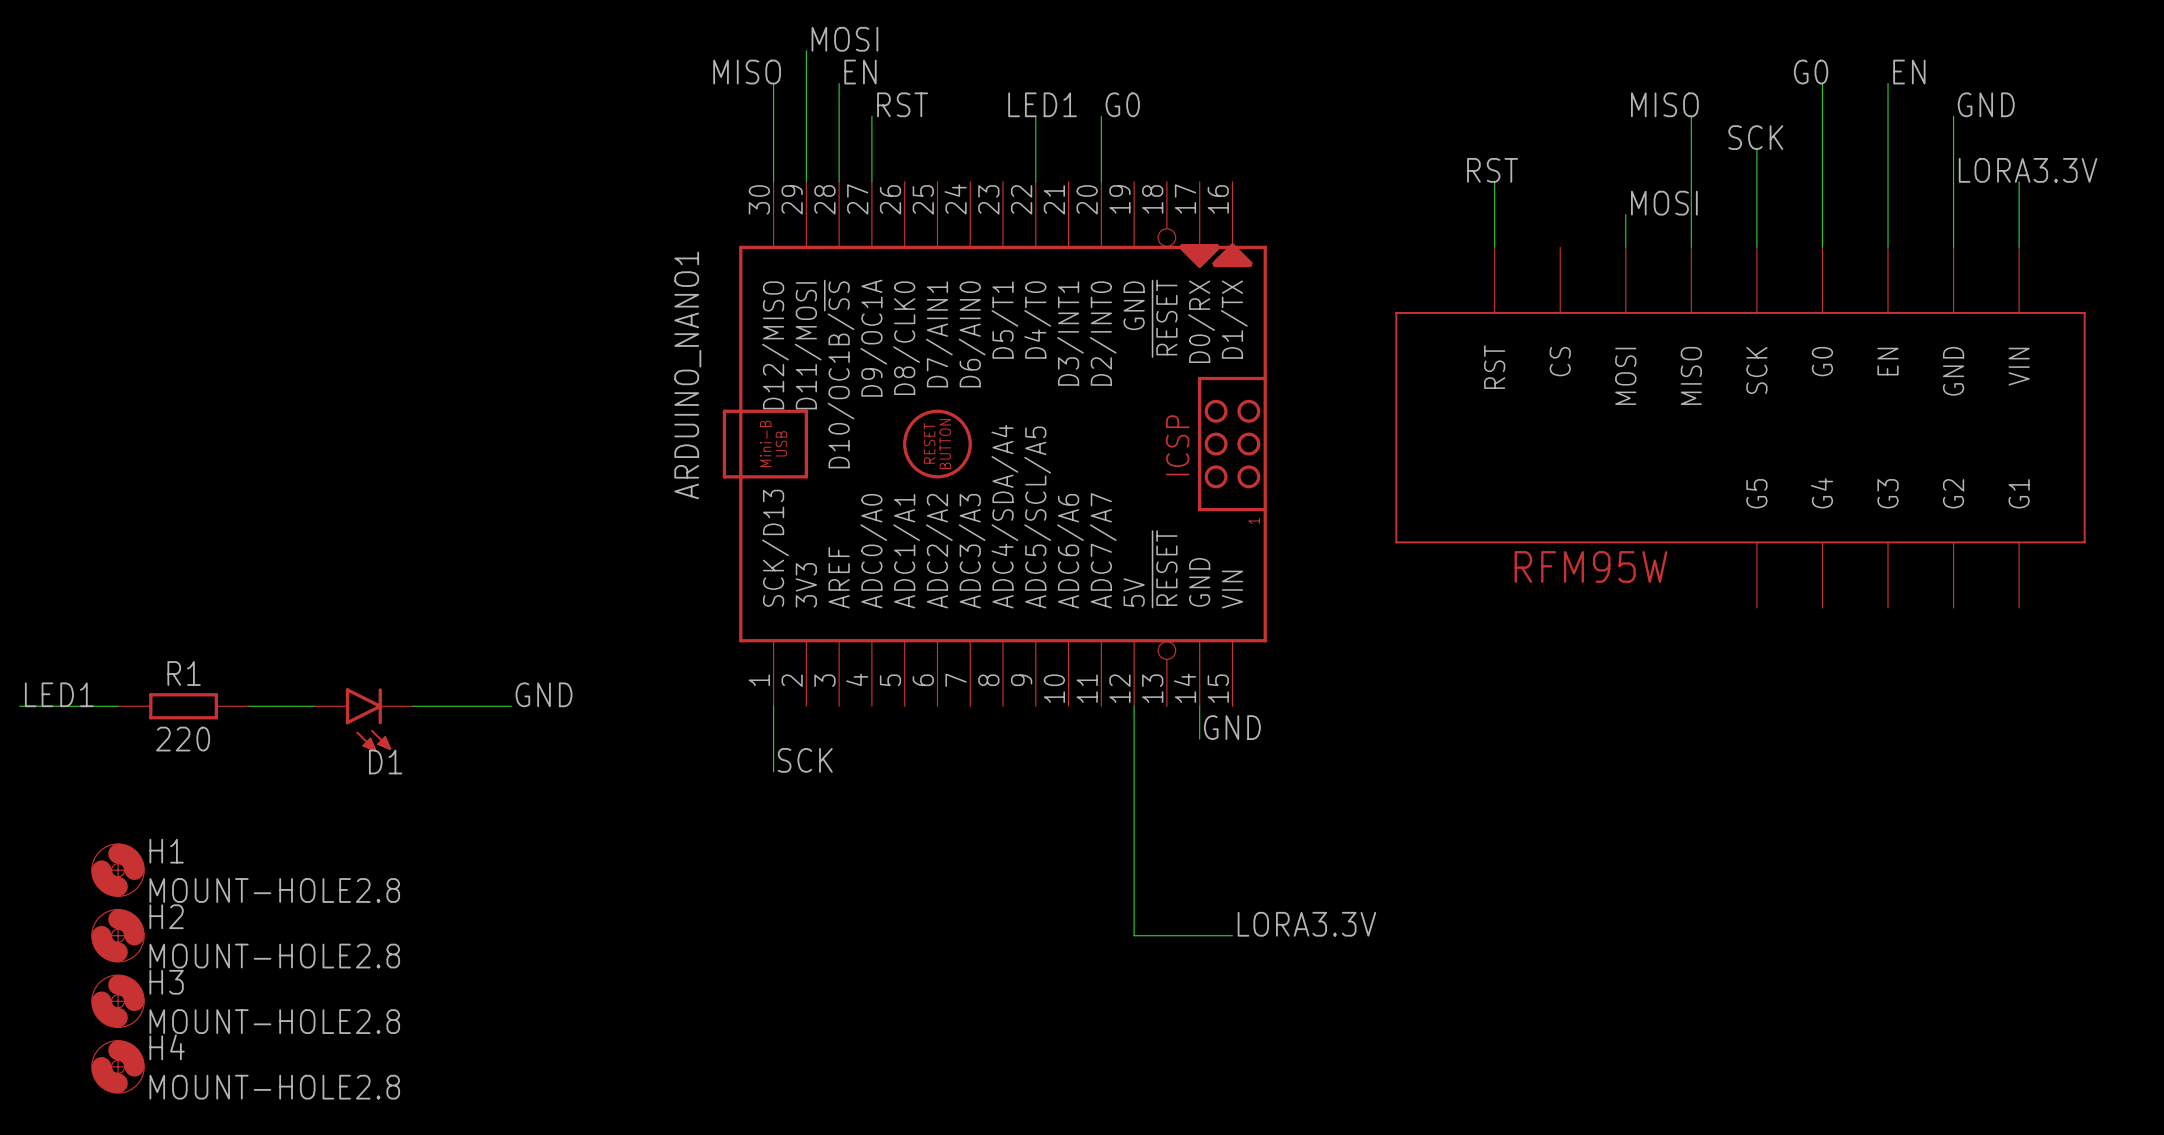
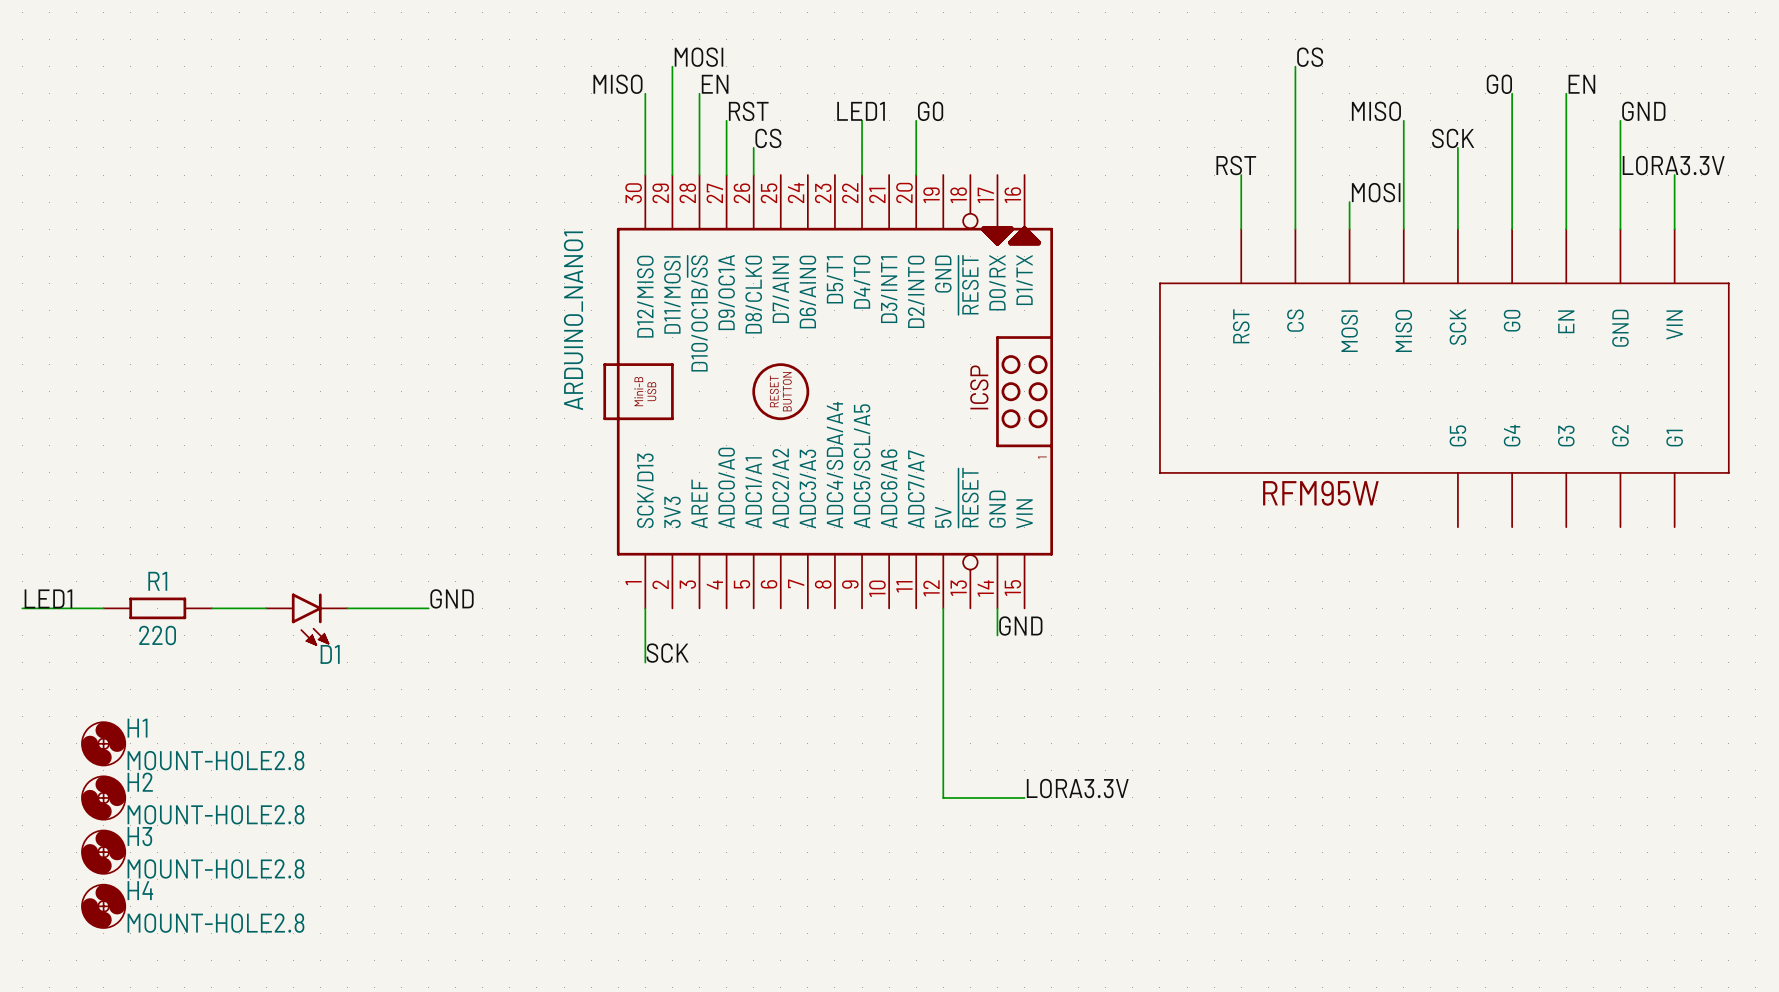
label: none -> CS (1310, 57)
wire: none -> (1295, 66) (1295, 229)
label: none -> CS (768, 138)
wire: none -> (753, 147) (753, 175)

